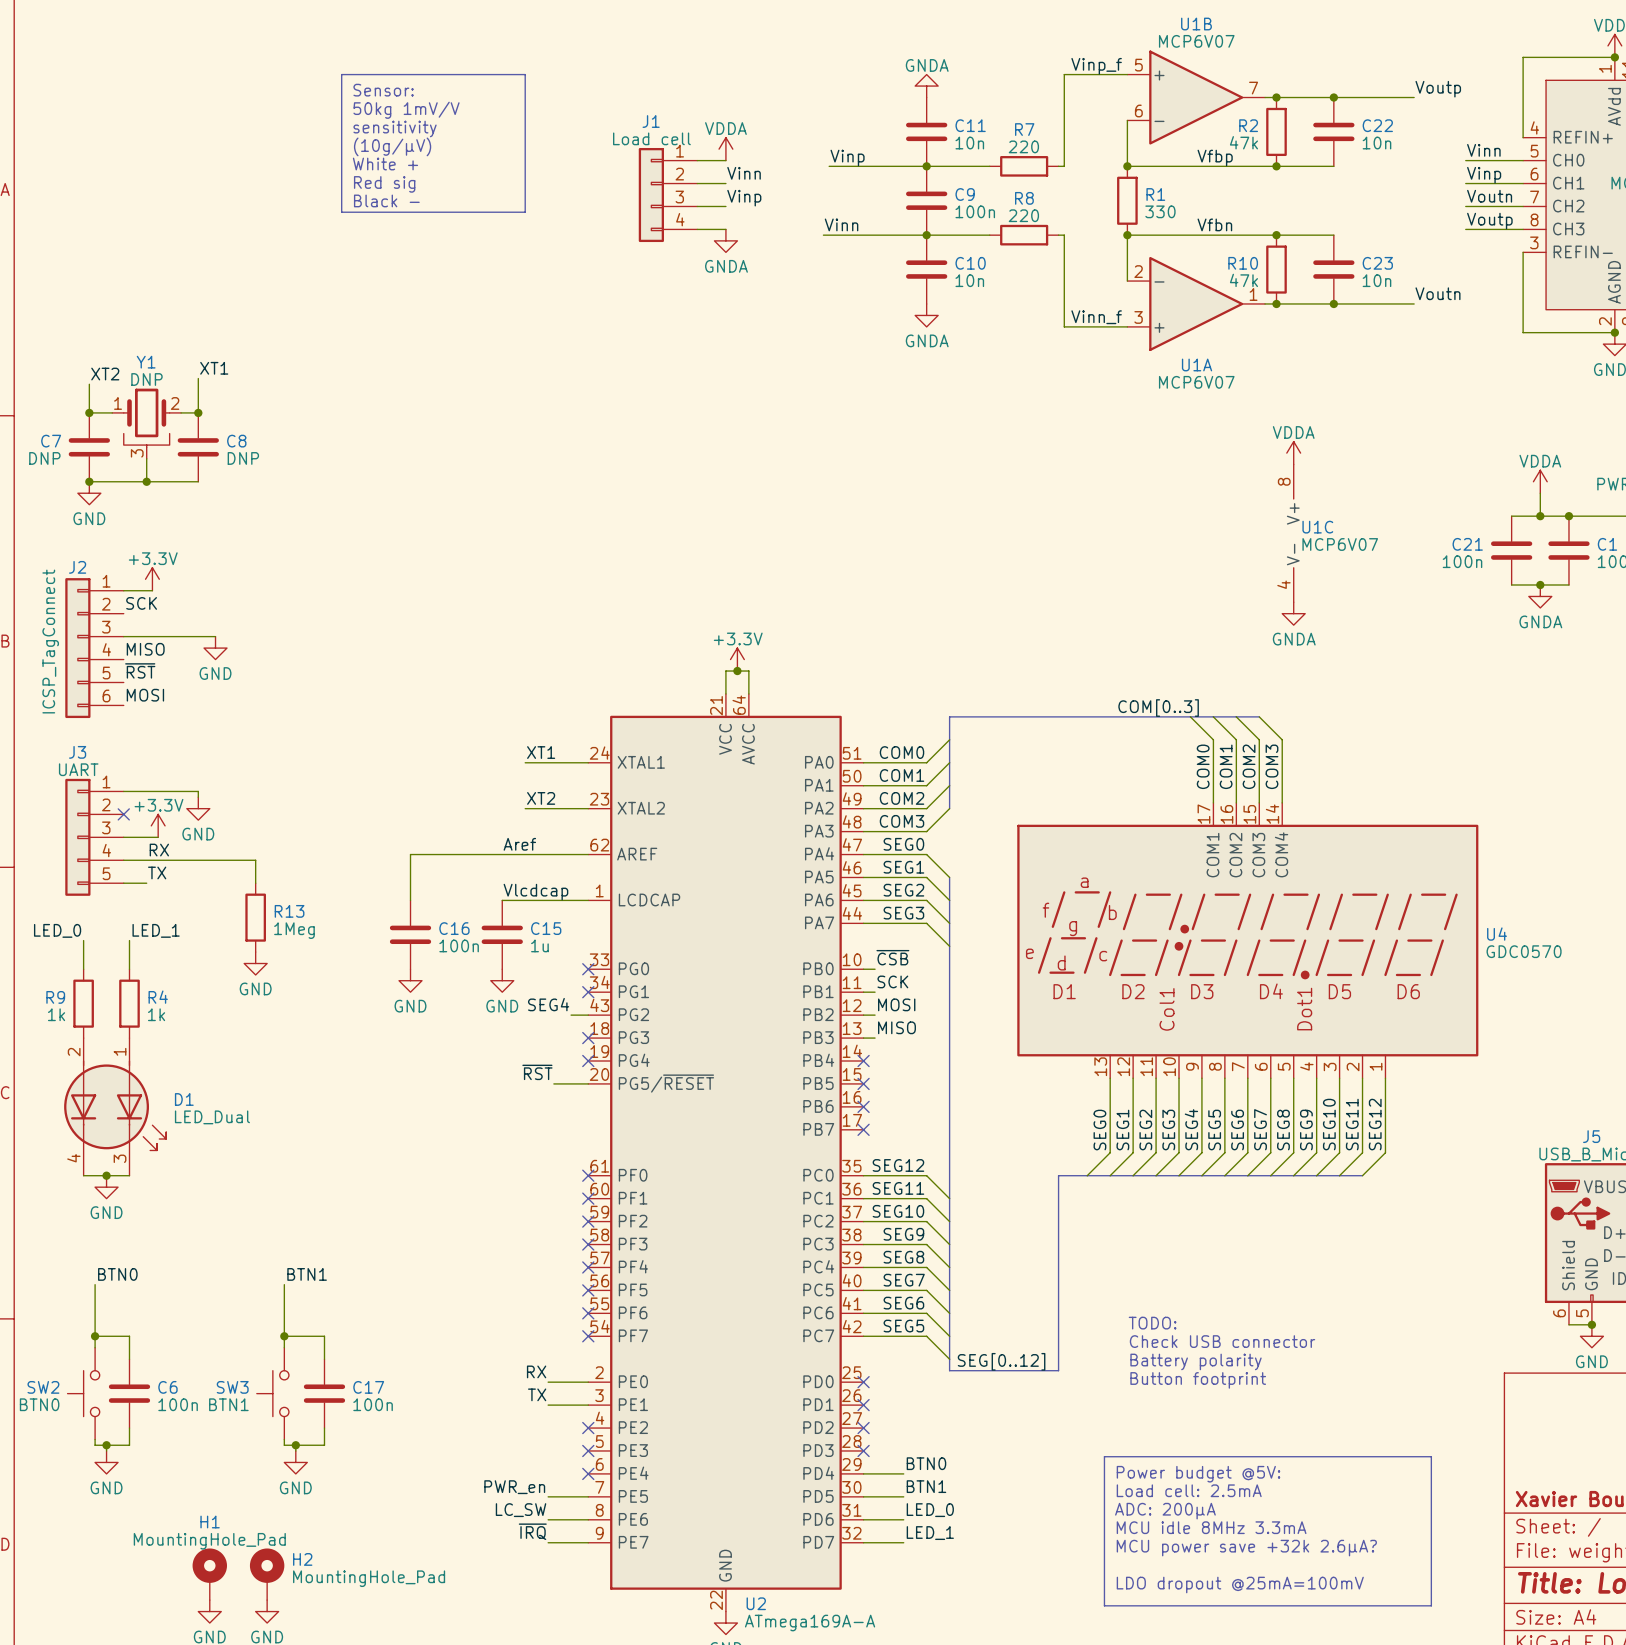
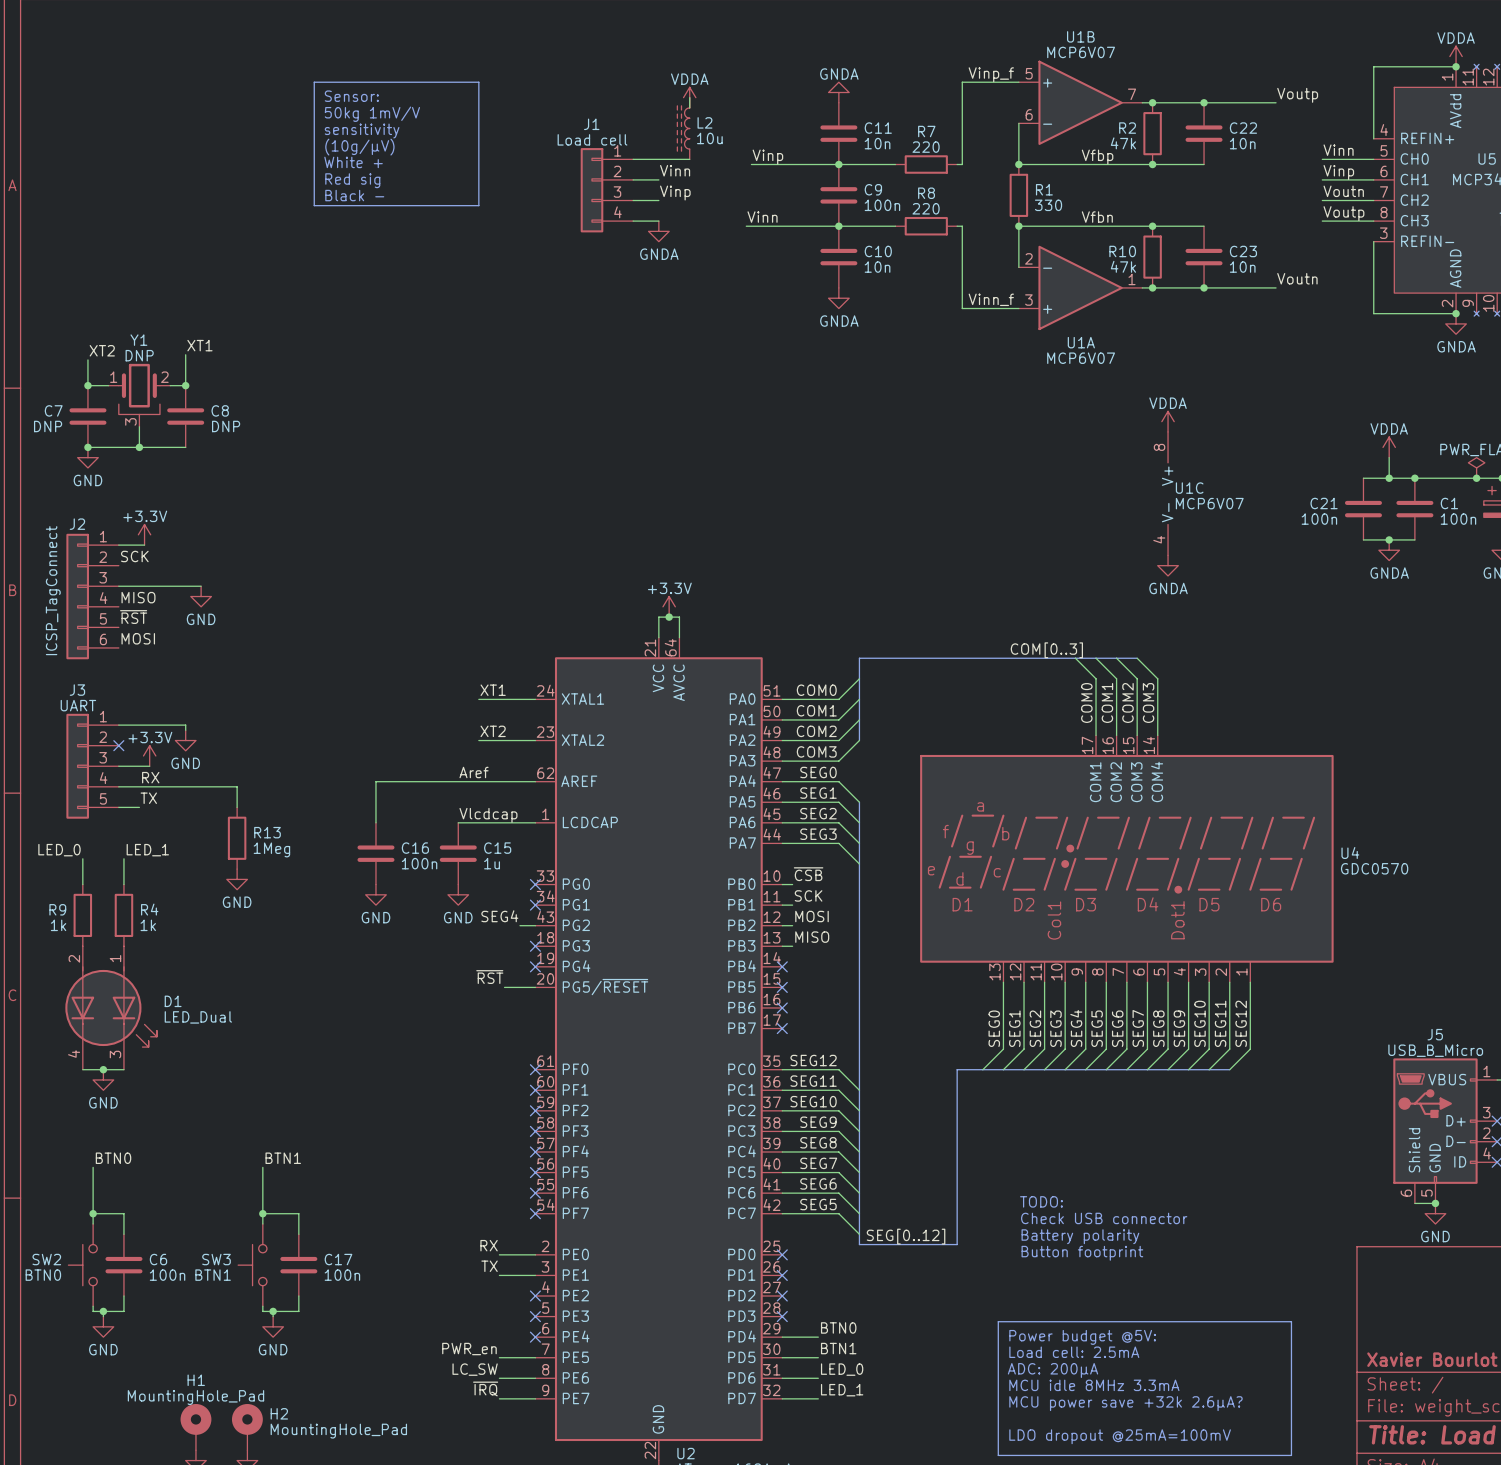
wire: none -> (689, 97) (689, 107)
L2: none -> 10u (683, 128)
power symbol position: VDDA (725, 149) -> VDDA (689, 97)
wire: none -> (658, 159) (689, 159)

